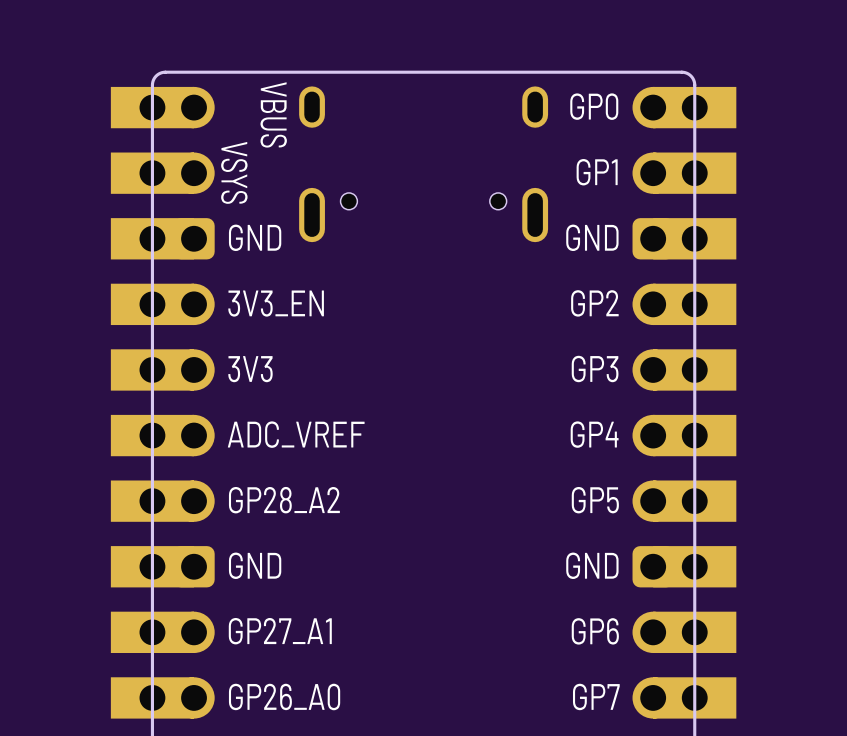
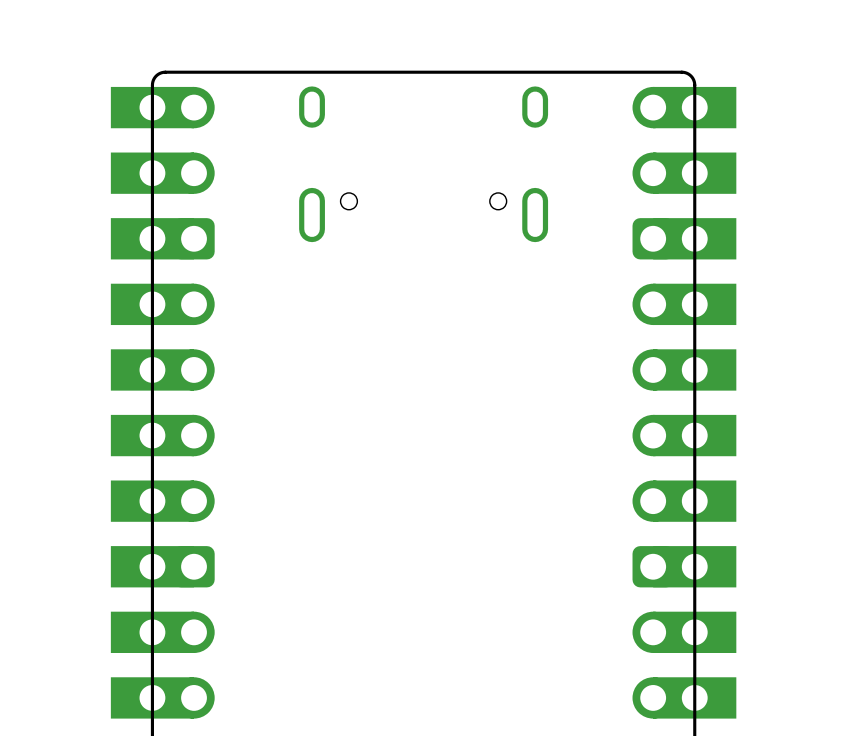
text: GP0 (594, 106) -> none
text: VBUS (273, 114) -> none
text: VSYS (234, 172) -> none
text: GP1 (597, 172) -> none
text: GND (255, 237) -> none
text: GND (592, 237) -> none
text: 3V3_EN (276, 303) -> none
text: GP2 (594, 303) -> none
text: 3V3 (250, 369) -> none
text: GP3 (595, 369) -> none
text: ADC_VREF (296, 434) -> none
text: GP4 (594, 434) -> none
text: GP28_A2 (284, 500) -> none
text: GP5 (595, 500) -> none
text: GND (255, 565) -> none
text: GND (592, 565) -> none
text: GP27_A1 (280, 631) -> none
text: GP6 (595, 631) -> none
text: GP26_A0 (284, 696) -> none
text: GP7 (596, 696) -> none

